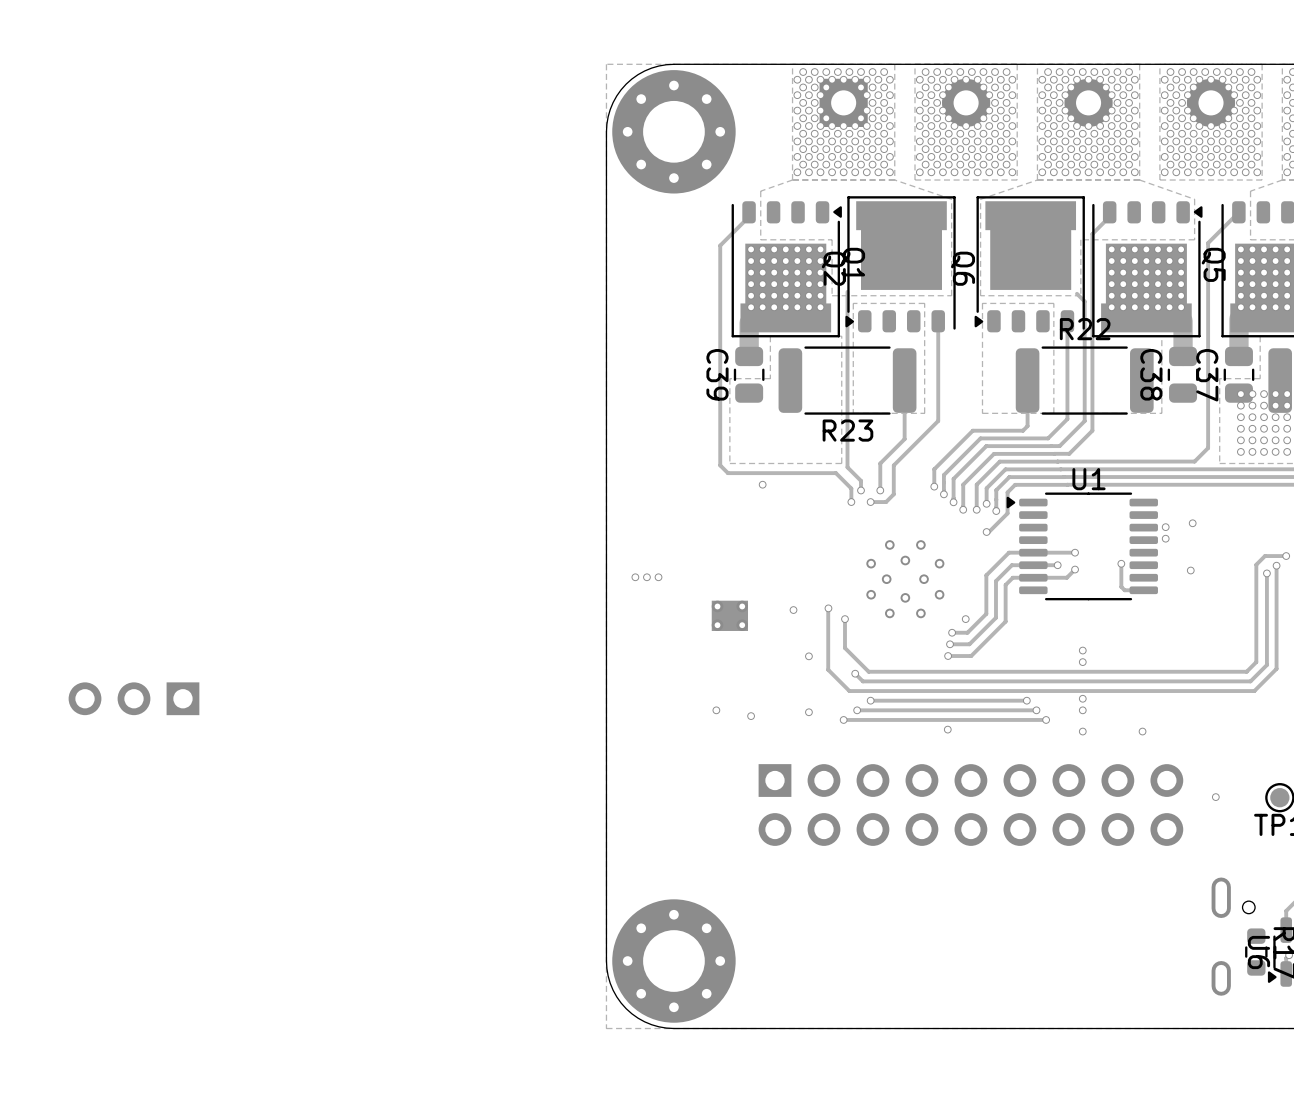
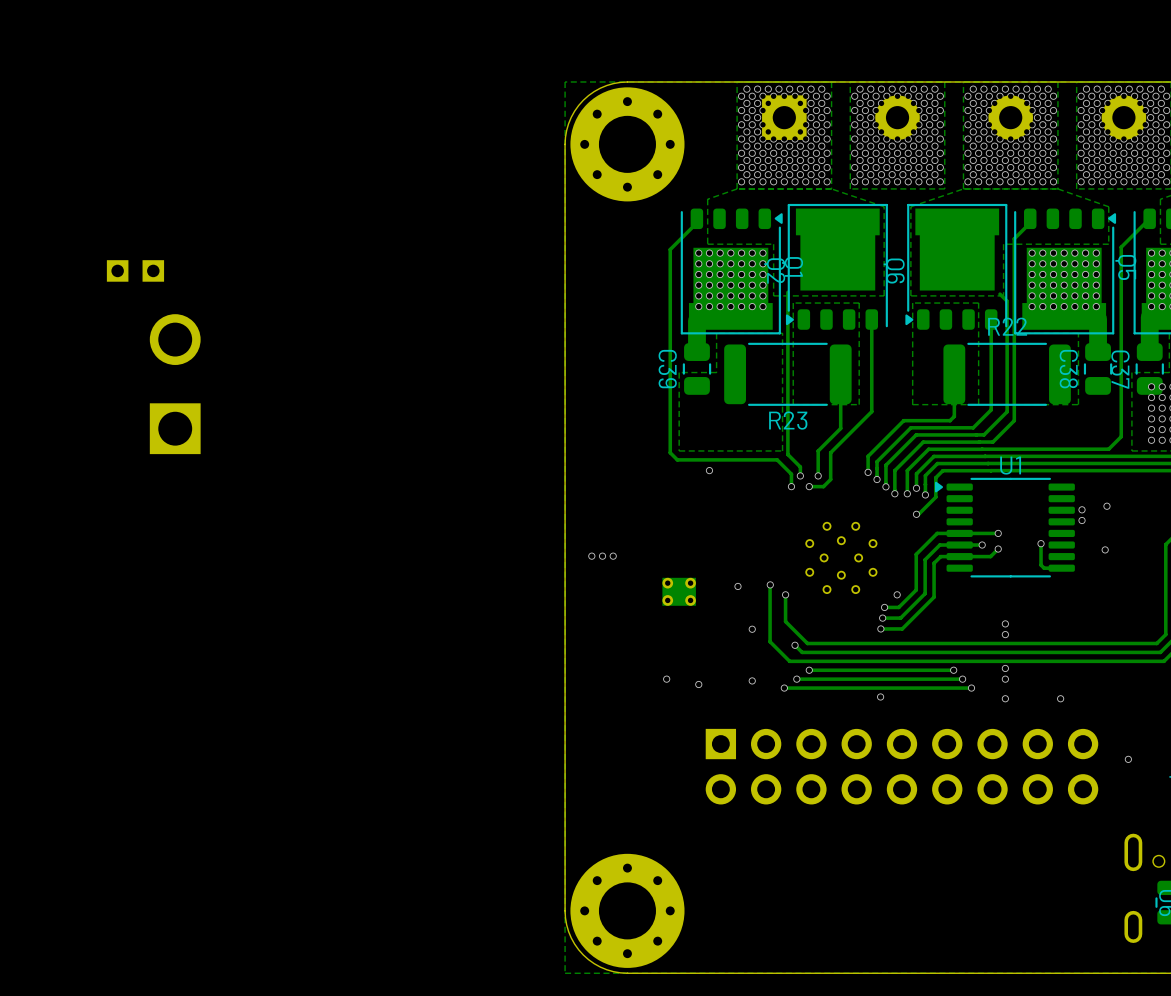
part: none -> (153, 357)
part: (133, 698) -> none

